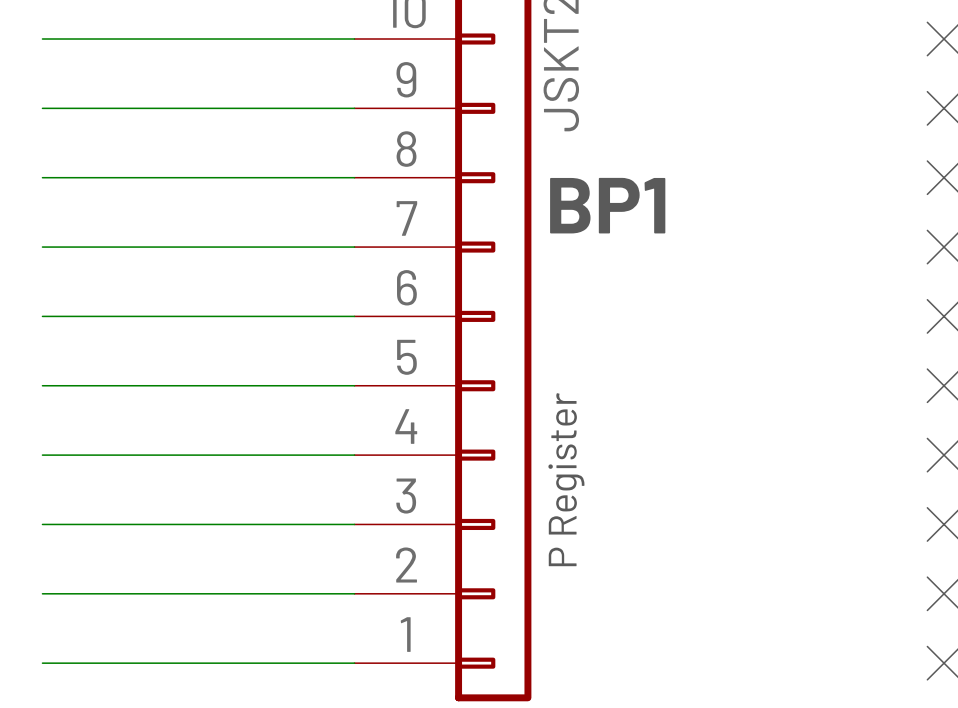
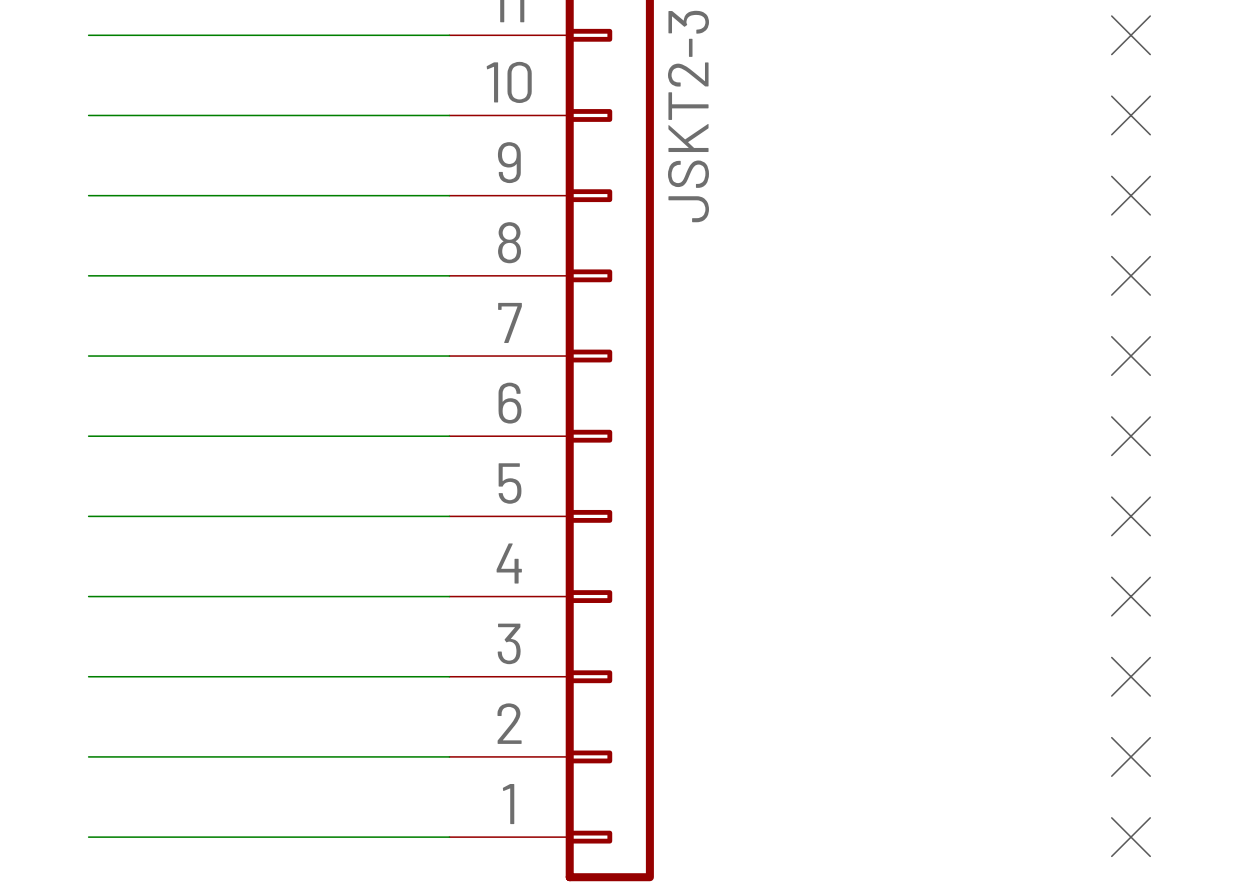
text: BP1 (607, 205) -> none
text: P Register (566, 479) -> none

